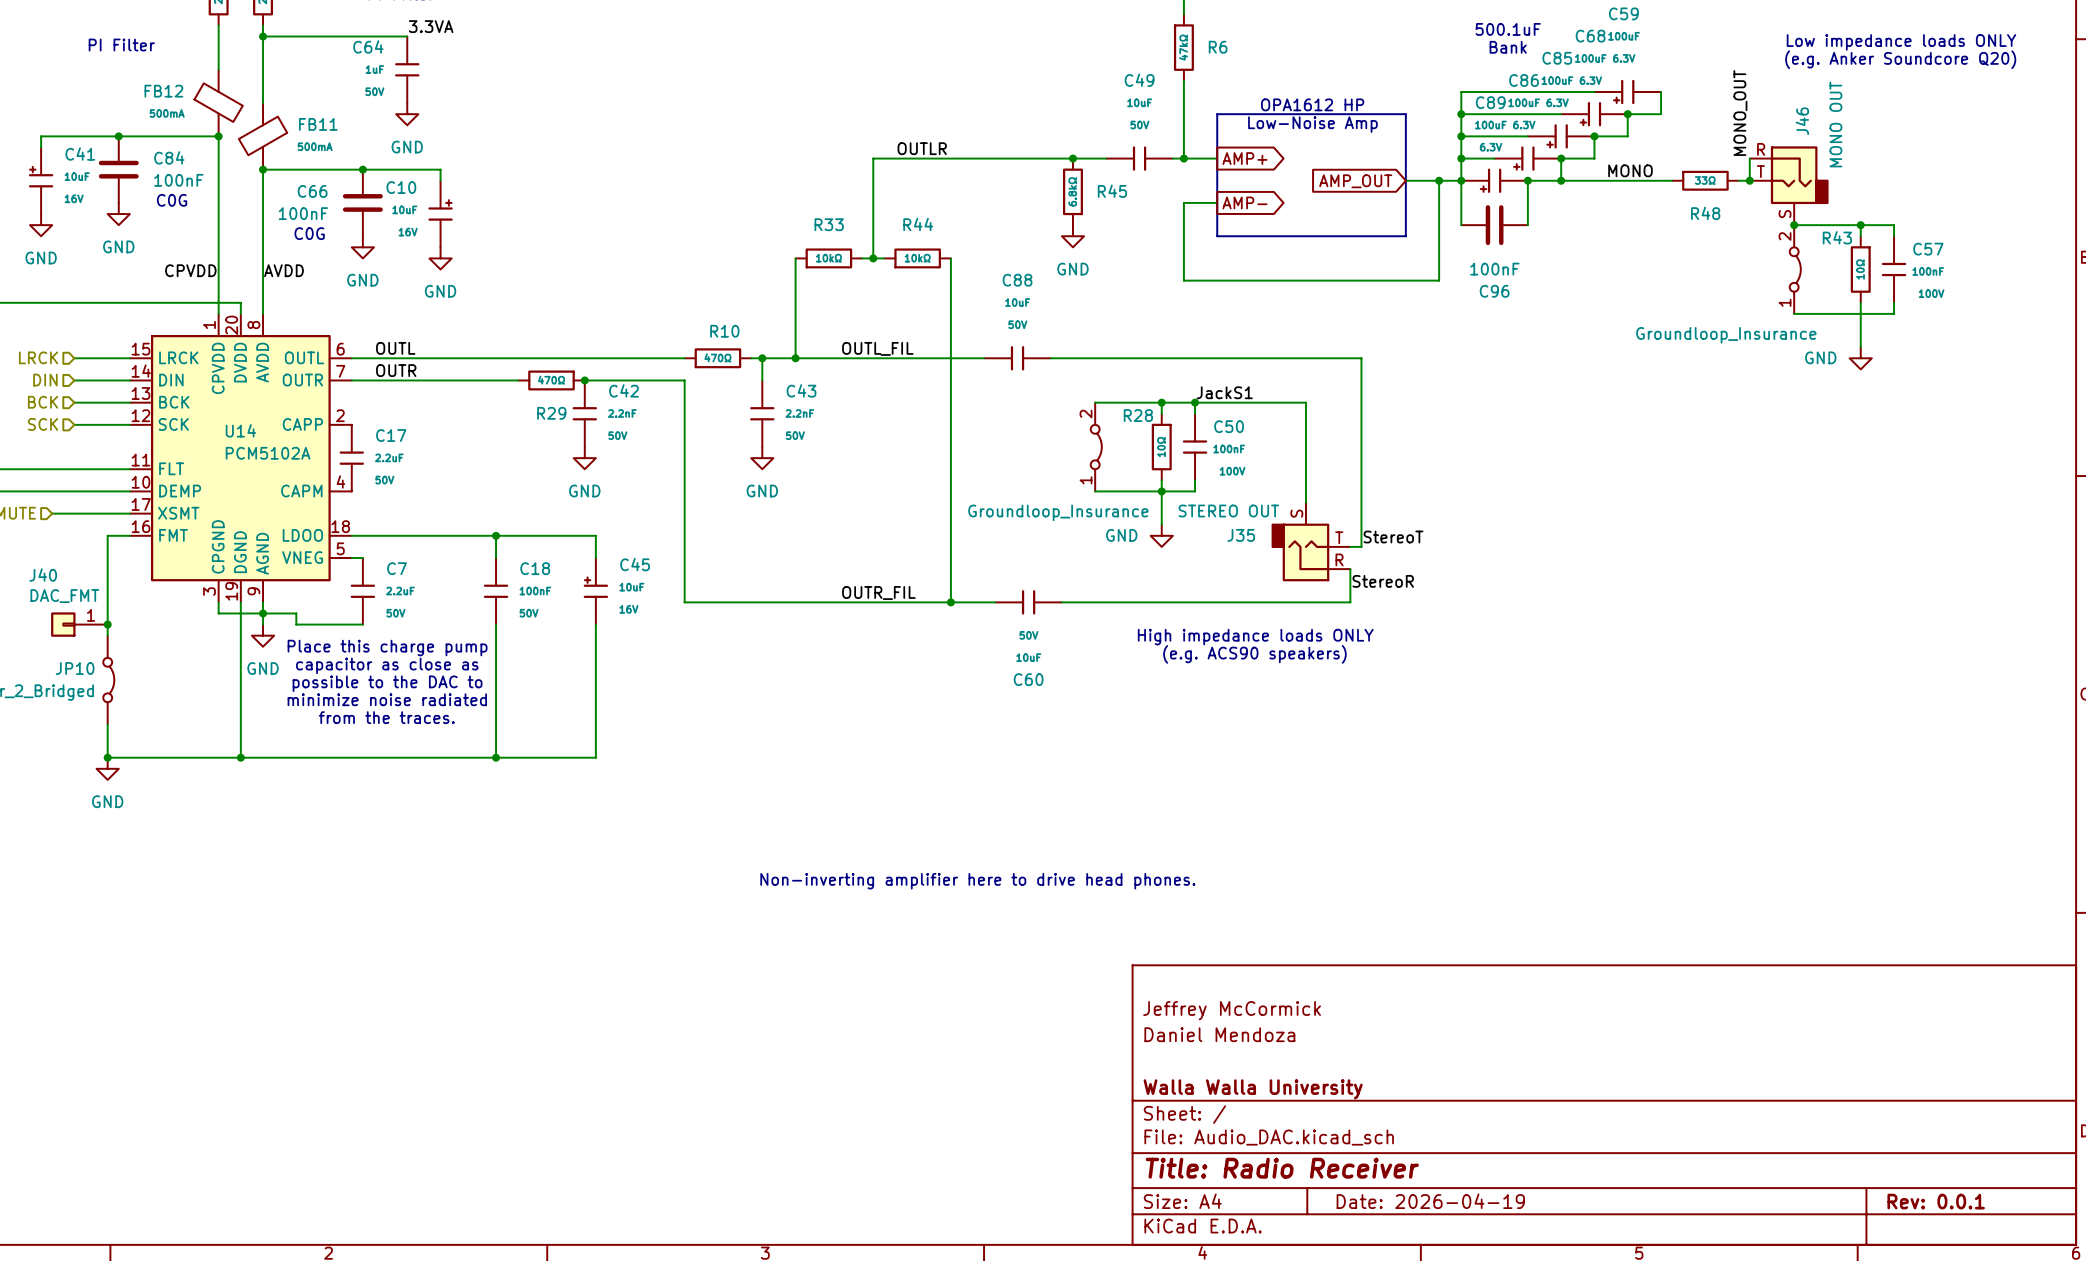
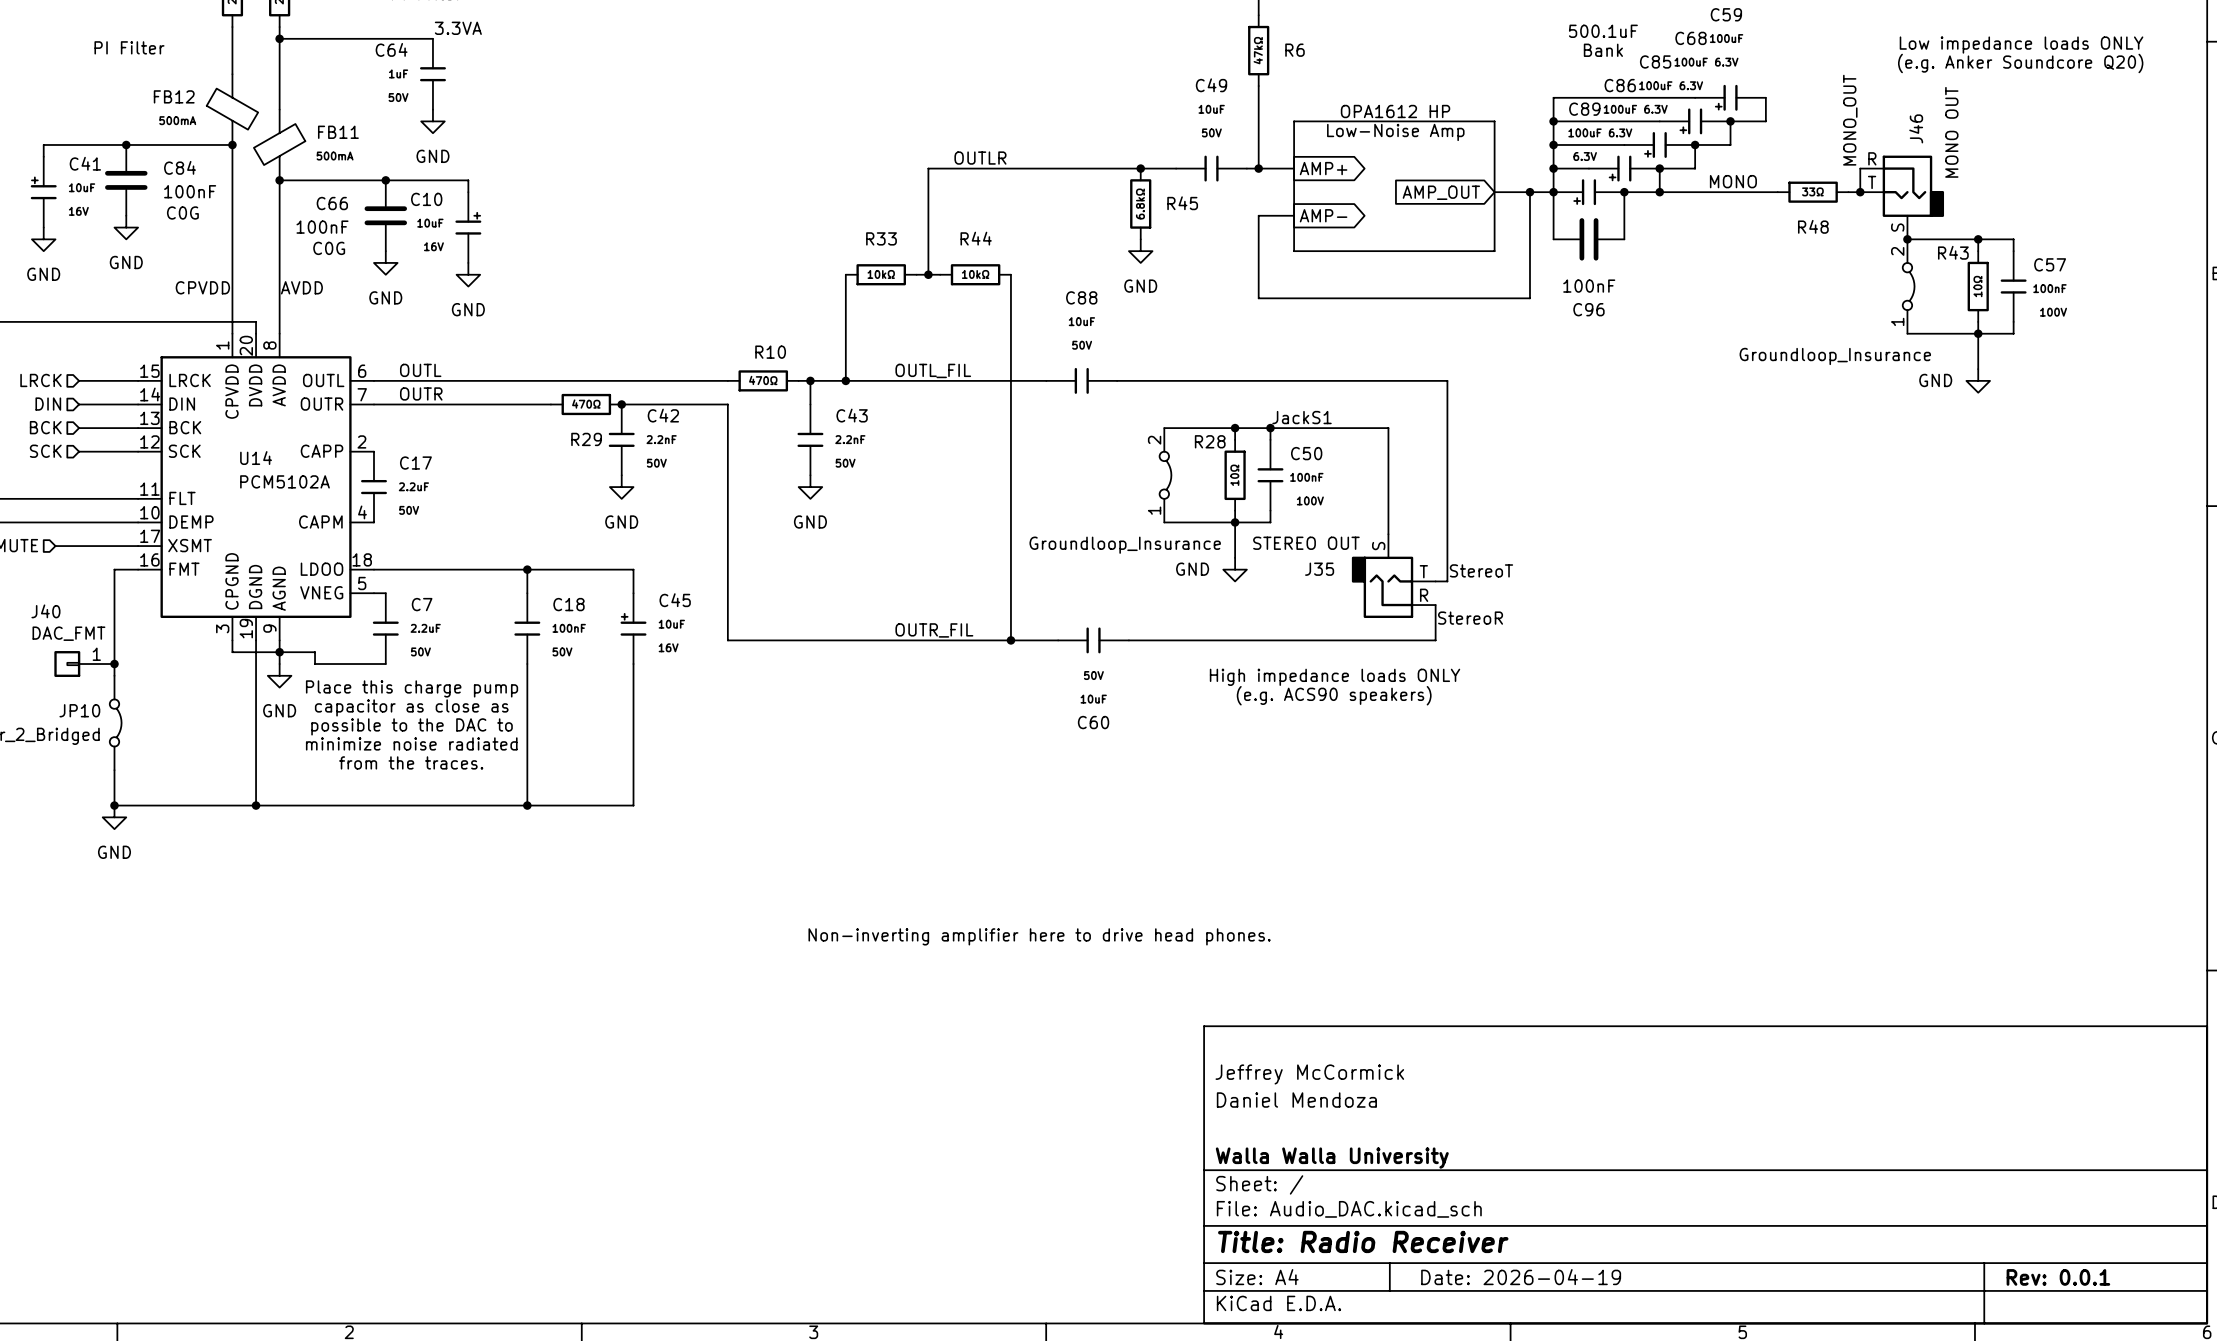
junction: none -> (1978, 333)

